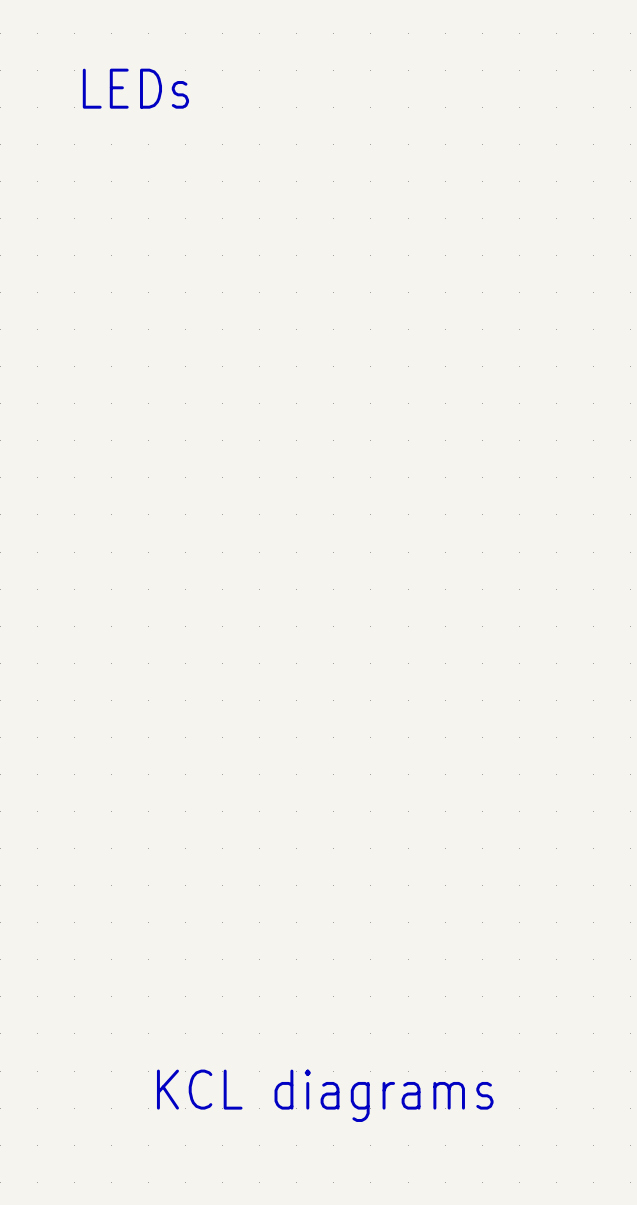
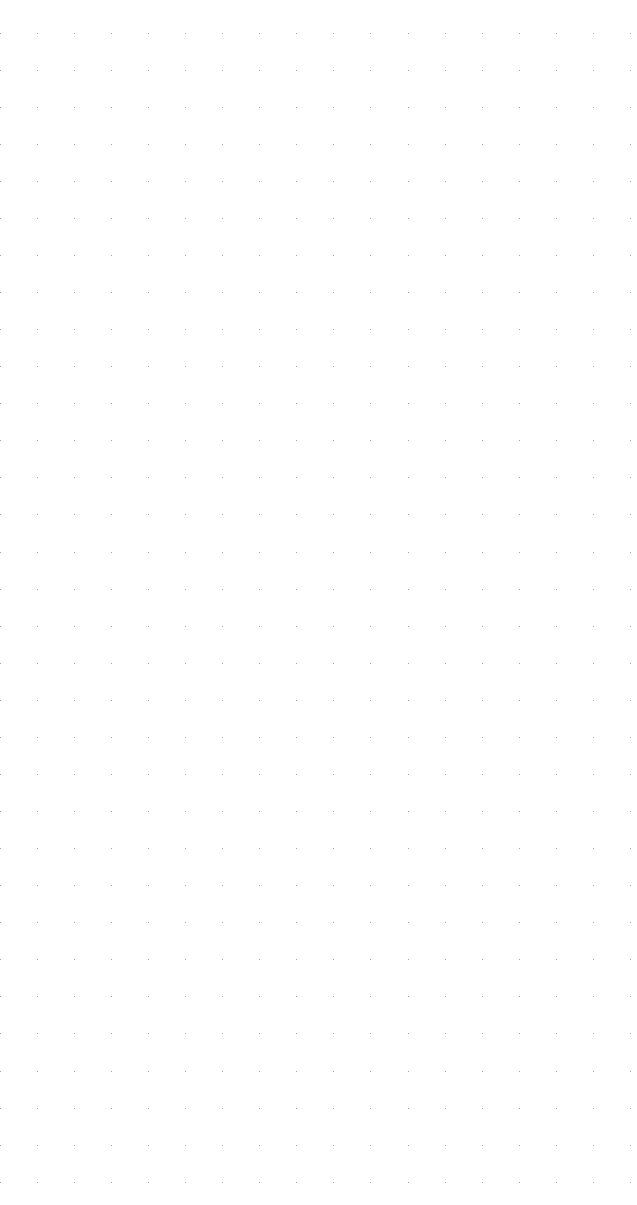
text: LEDs (135, 88) -> none
text: KCL diagrams (325, 1095) -> none

